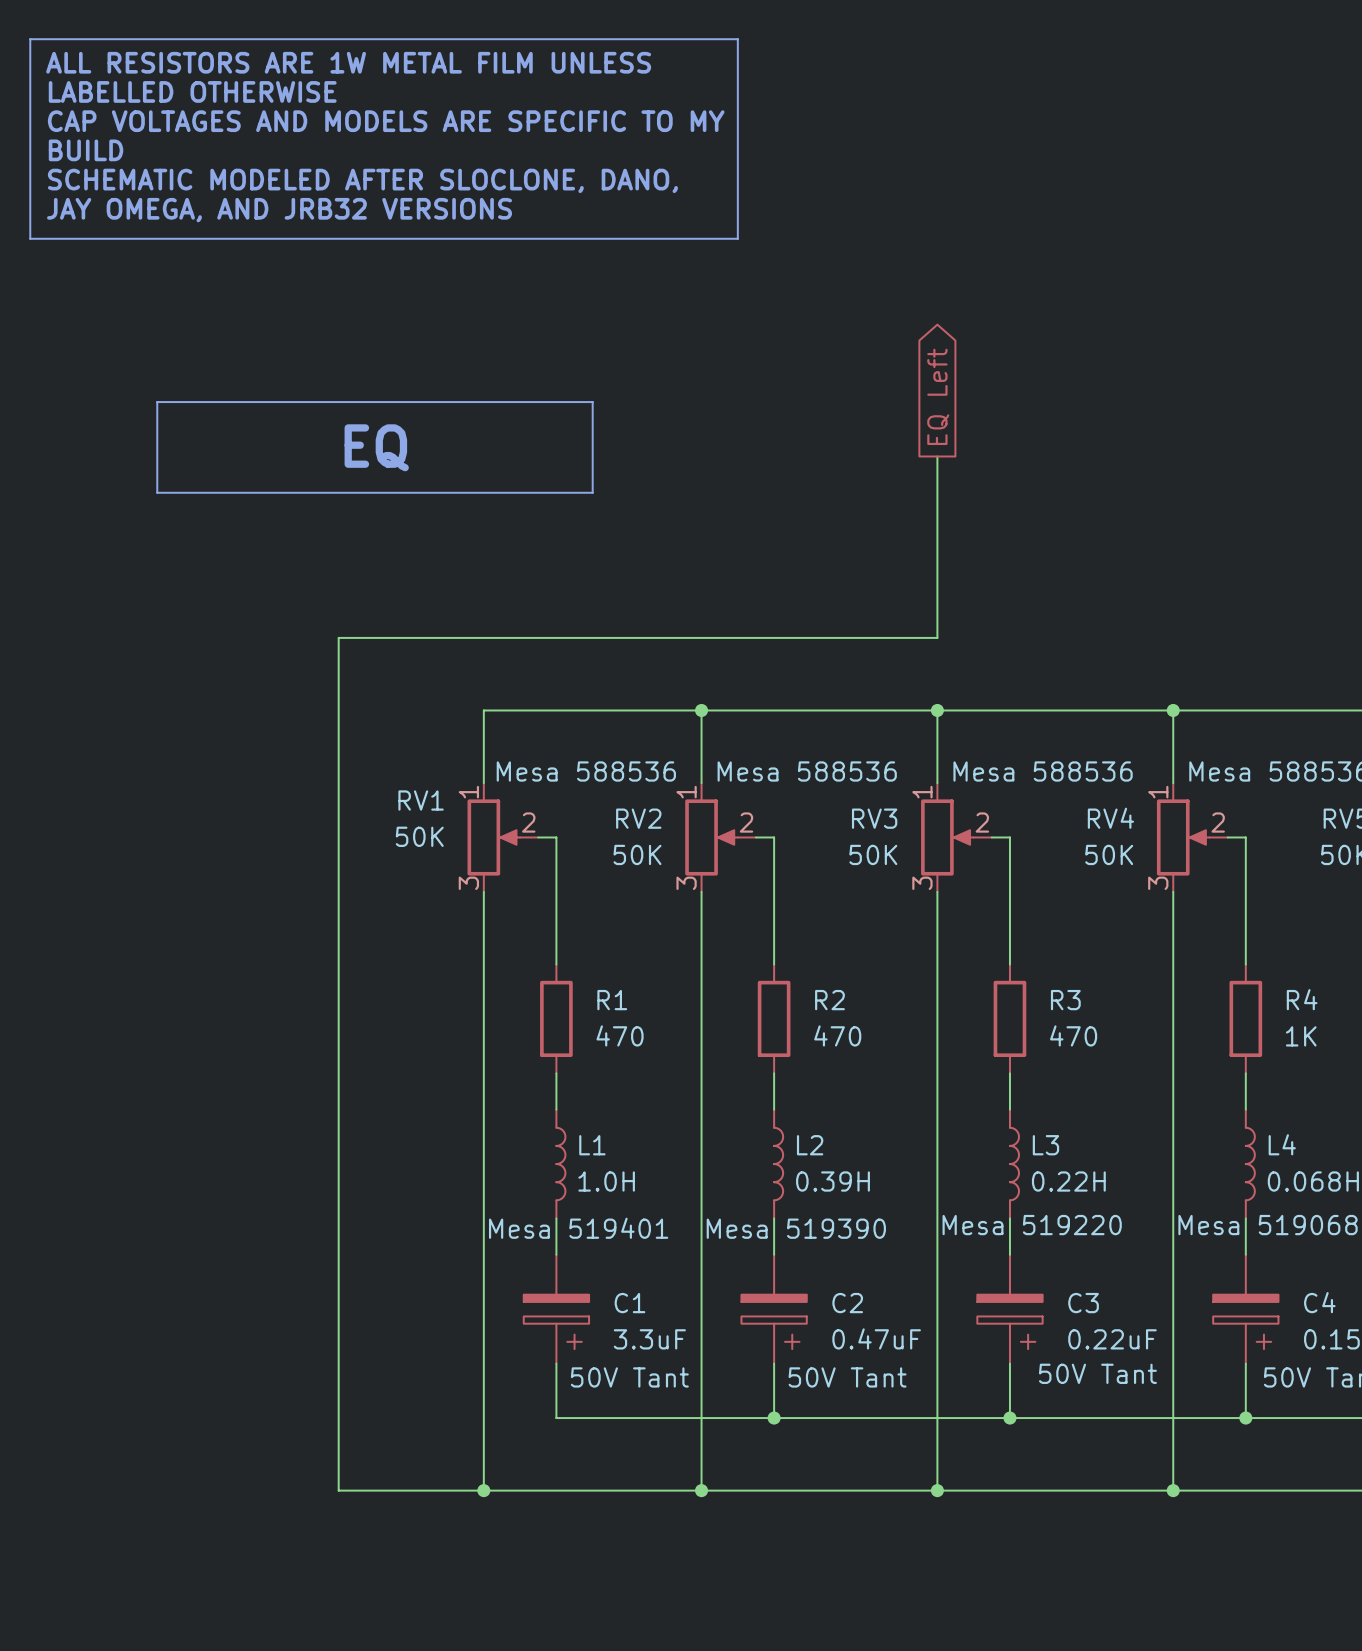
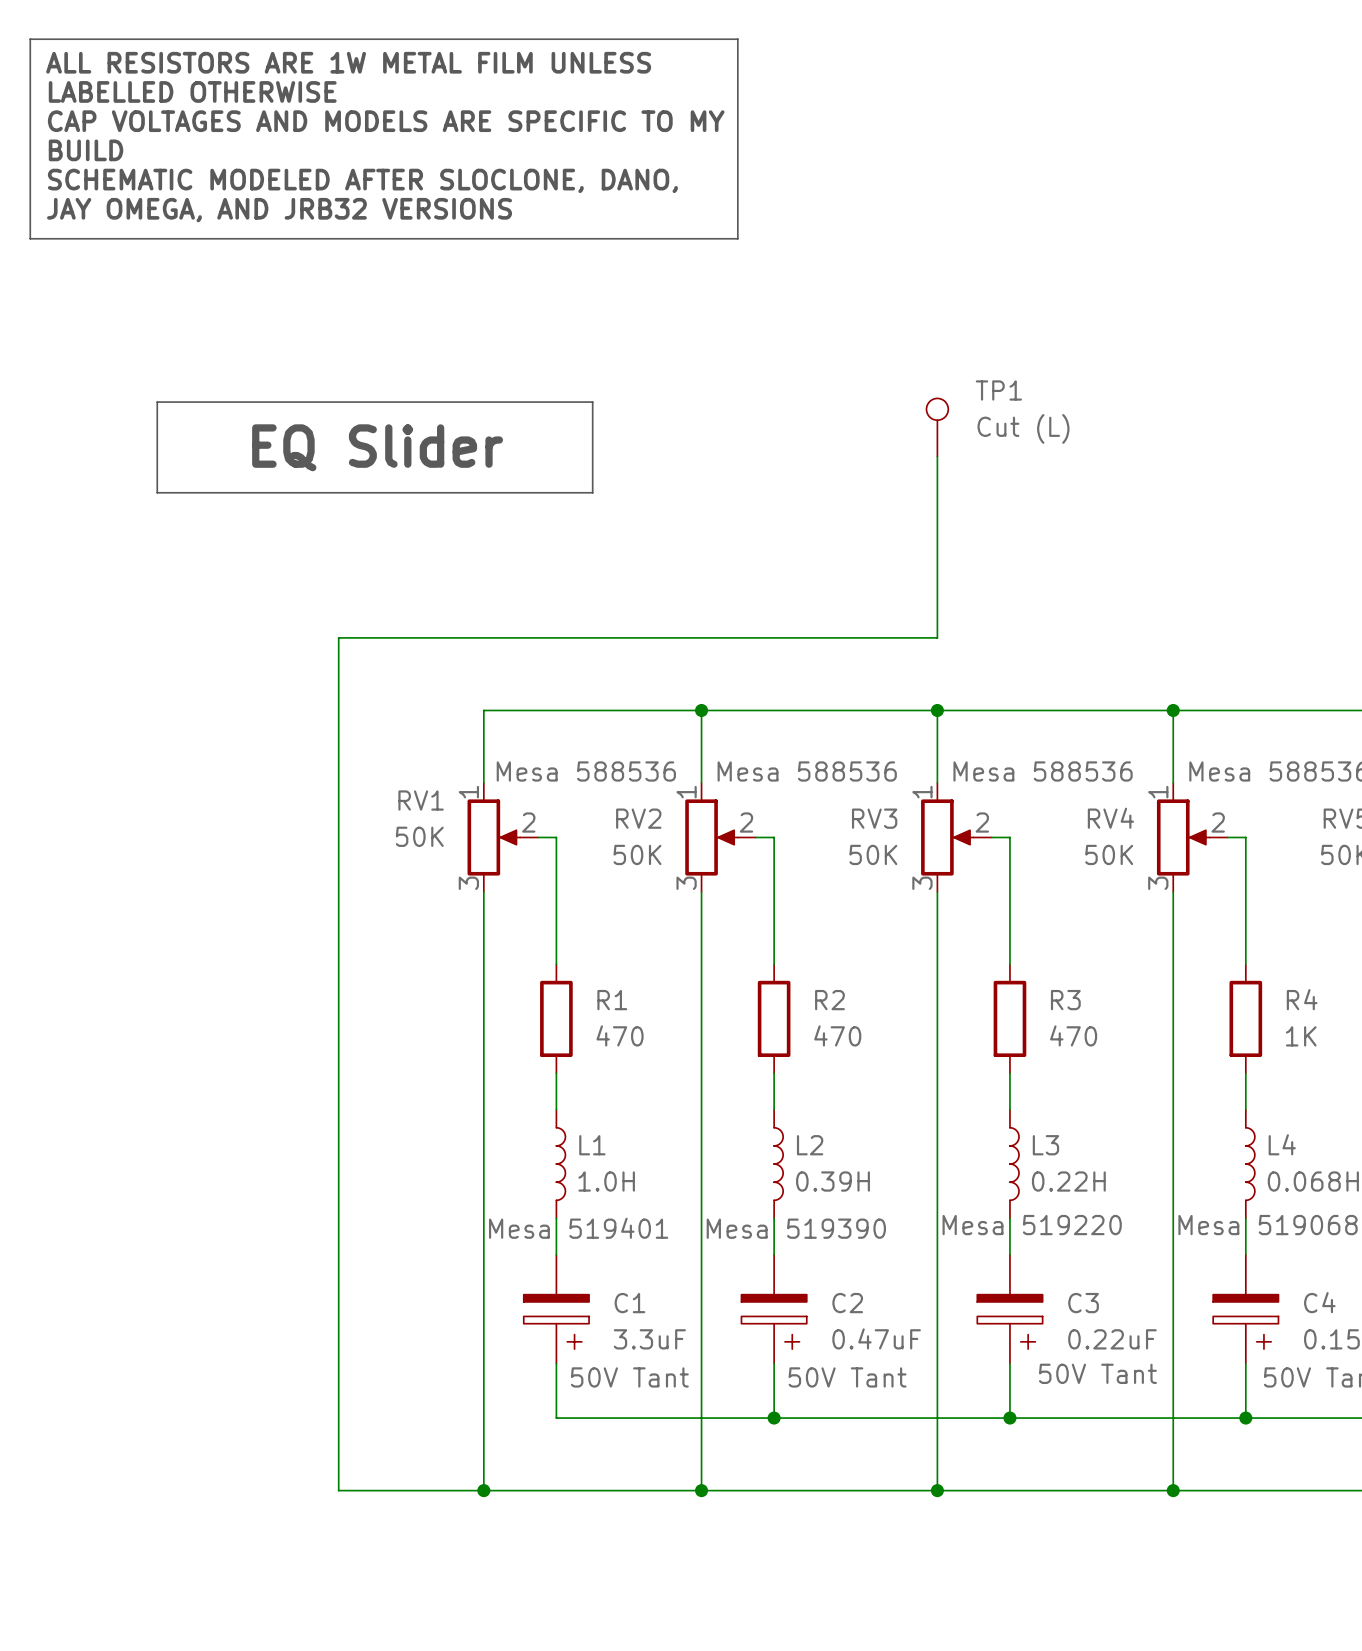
global label: EQ Left (938, 396) -> none
TP1: none -> Cut (L) (937, 427)
text: EQ (376, 447) -> EQ Slider (377, 447)

